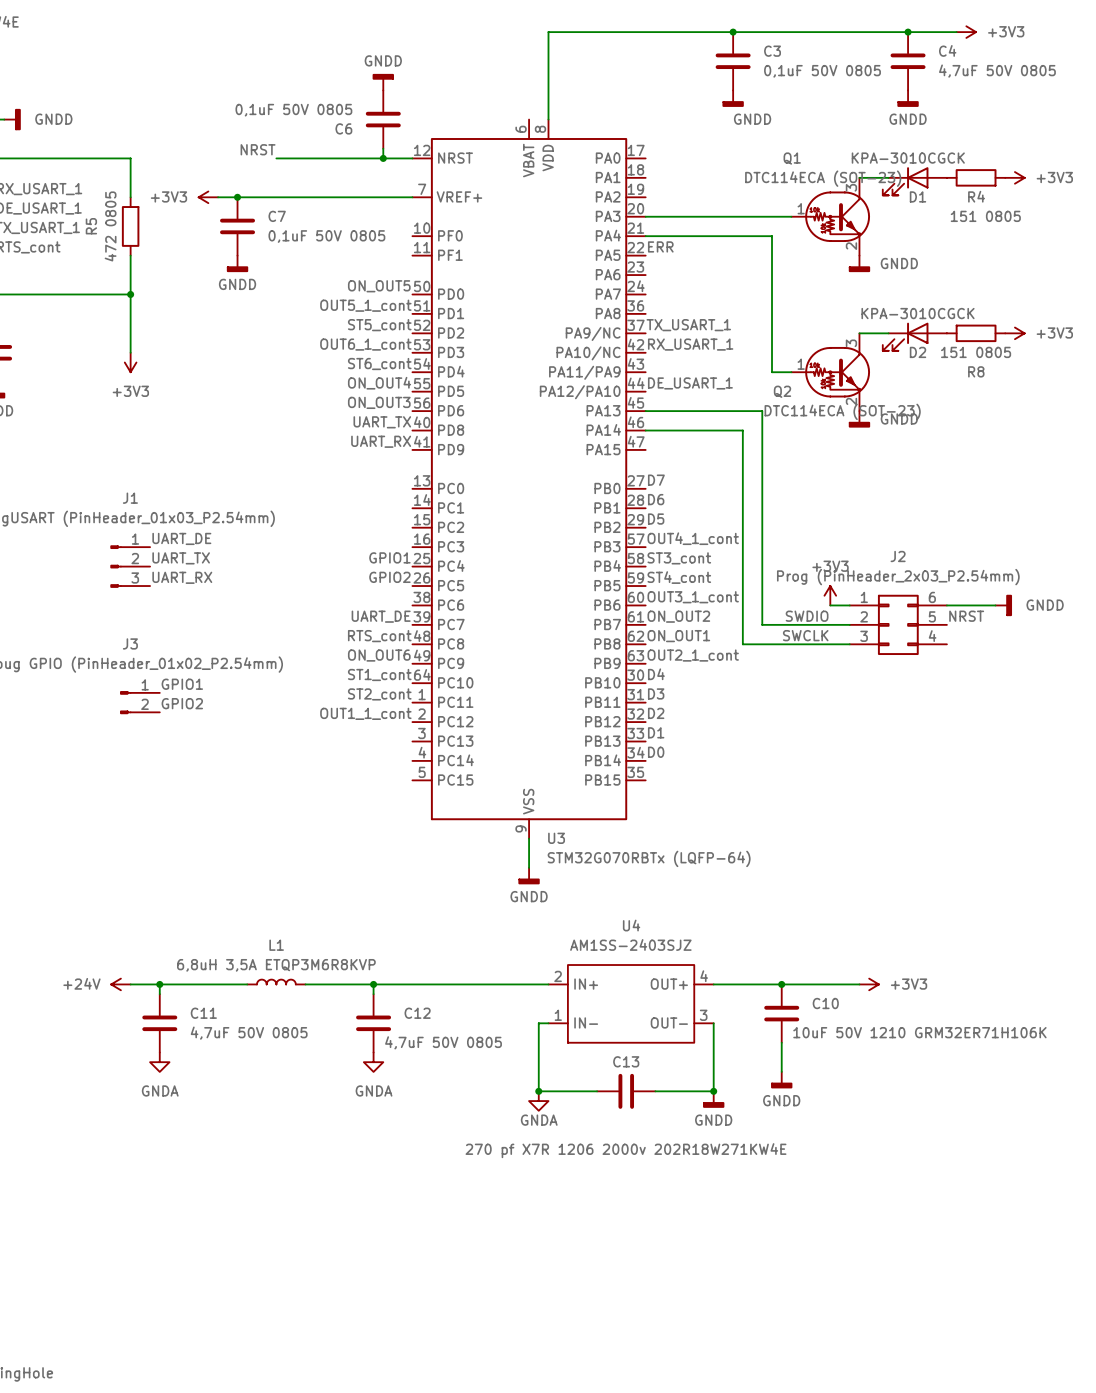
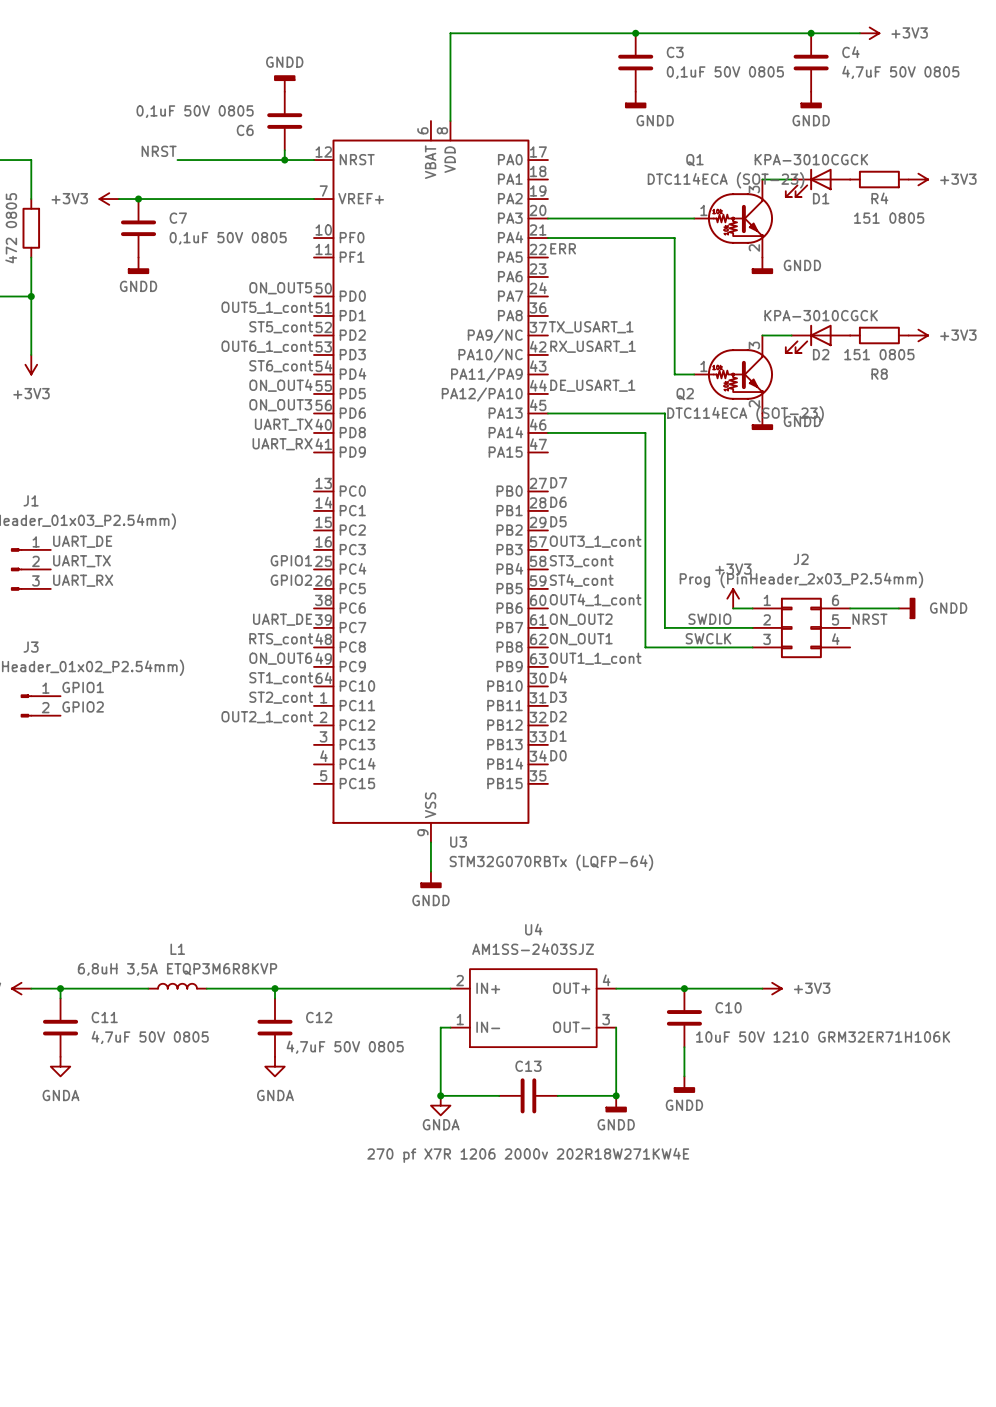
label: OUT4_1_cont (693, 538) -> OUT3_1_cont (595, 541)
label: OUT3_1_cont (693, 597) -> OUT4_1_cont (595, 599)
label: OUT2_1_cont (693, 655) -> OUT1_1_cont (595, 658)
label: OUT1_1_cont (365, 713) -> OUT2_1_cont (267, 717)

